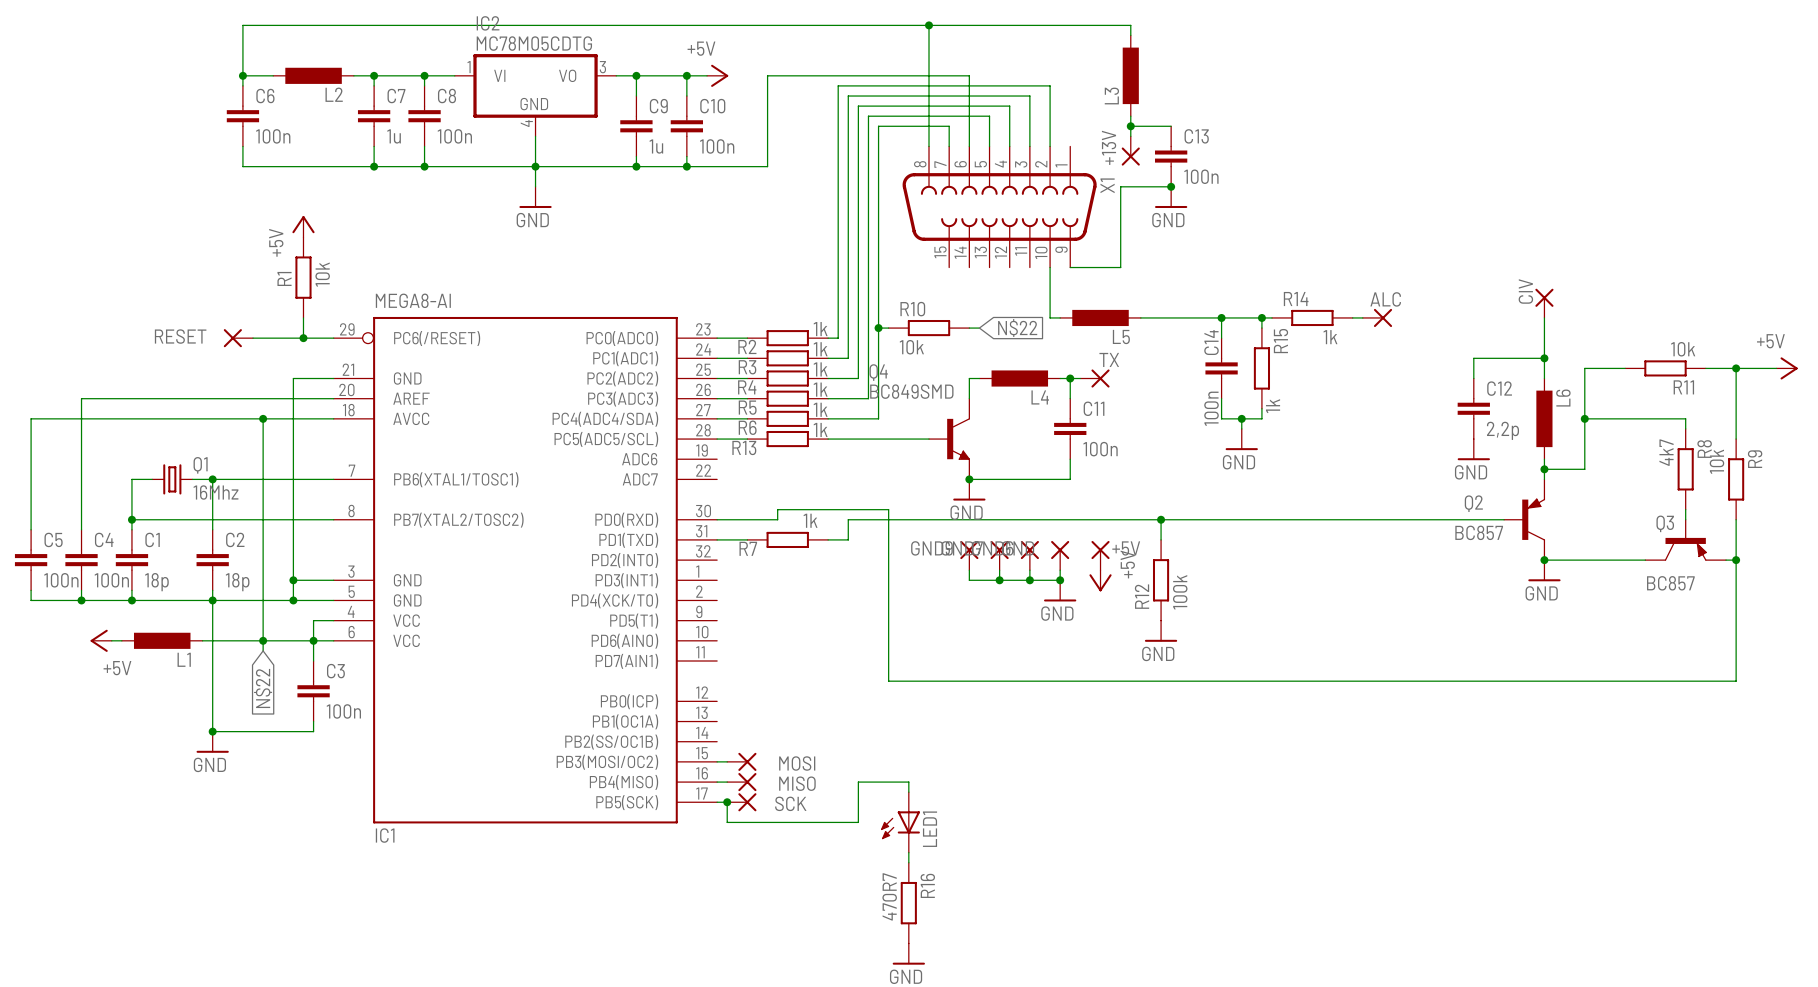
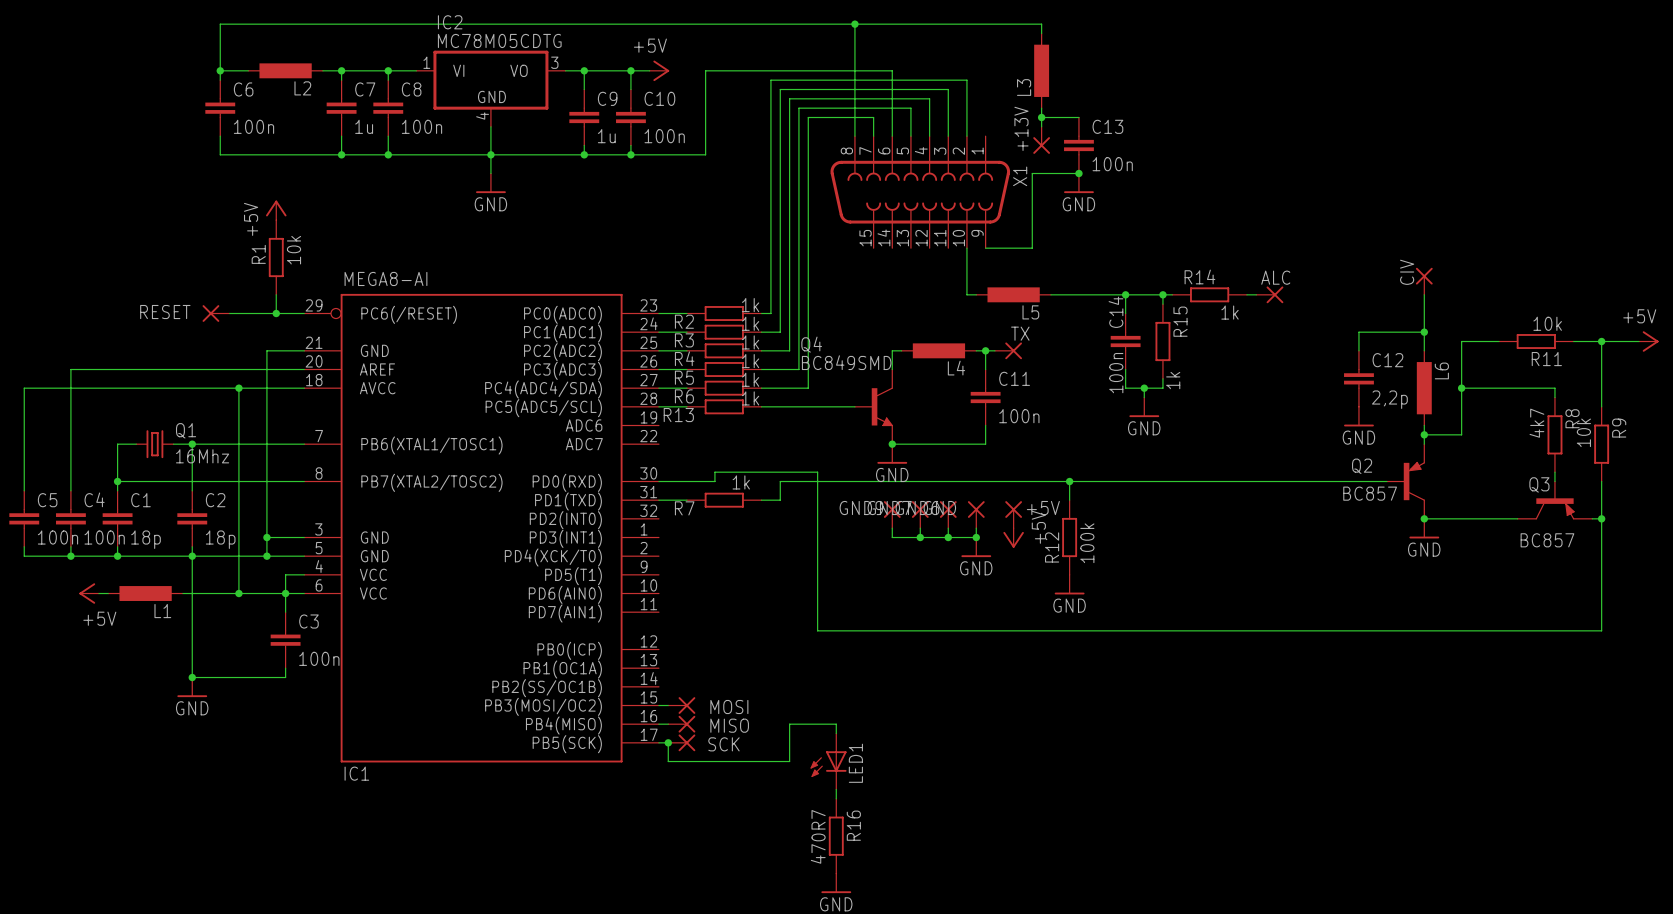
wire: (878, 328) (888, 328) -> none
junction: (878, 328) -> none
R10: 10k (929, 328) -> none
wire: (969, 328) (979, 328) -> none
global label: N$22 (1017, 328) -> none
wire: (263, 640) (263, 650) -> none
global label: N$22 (263, 688) -> none

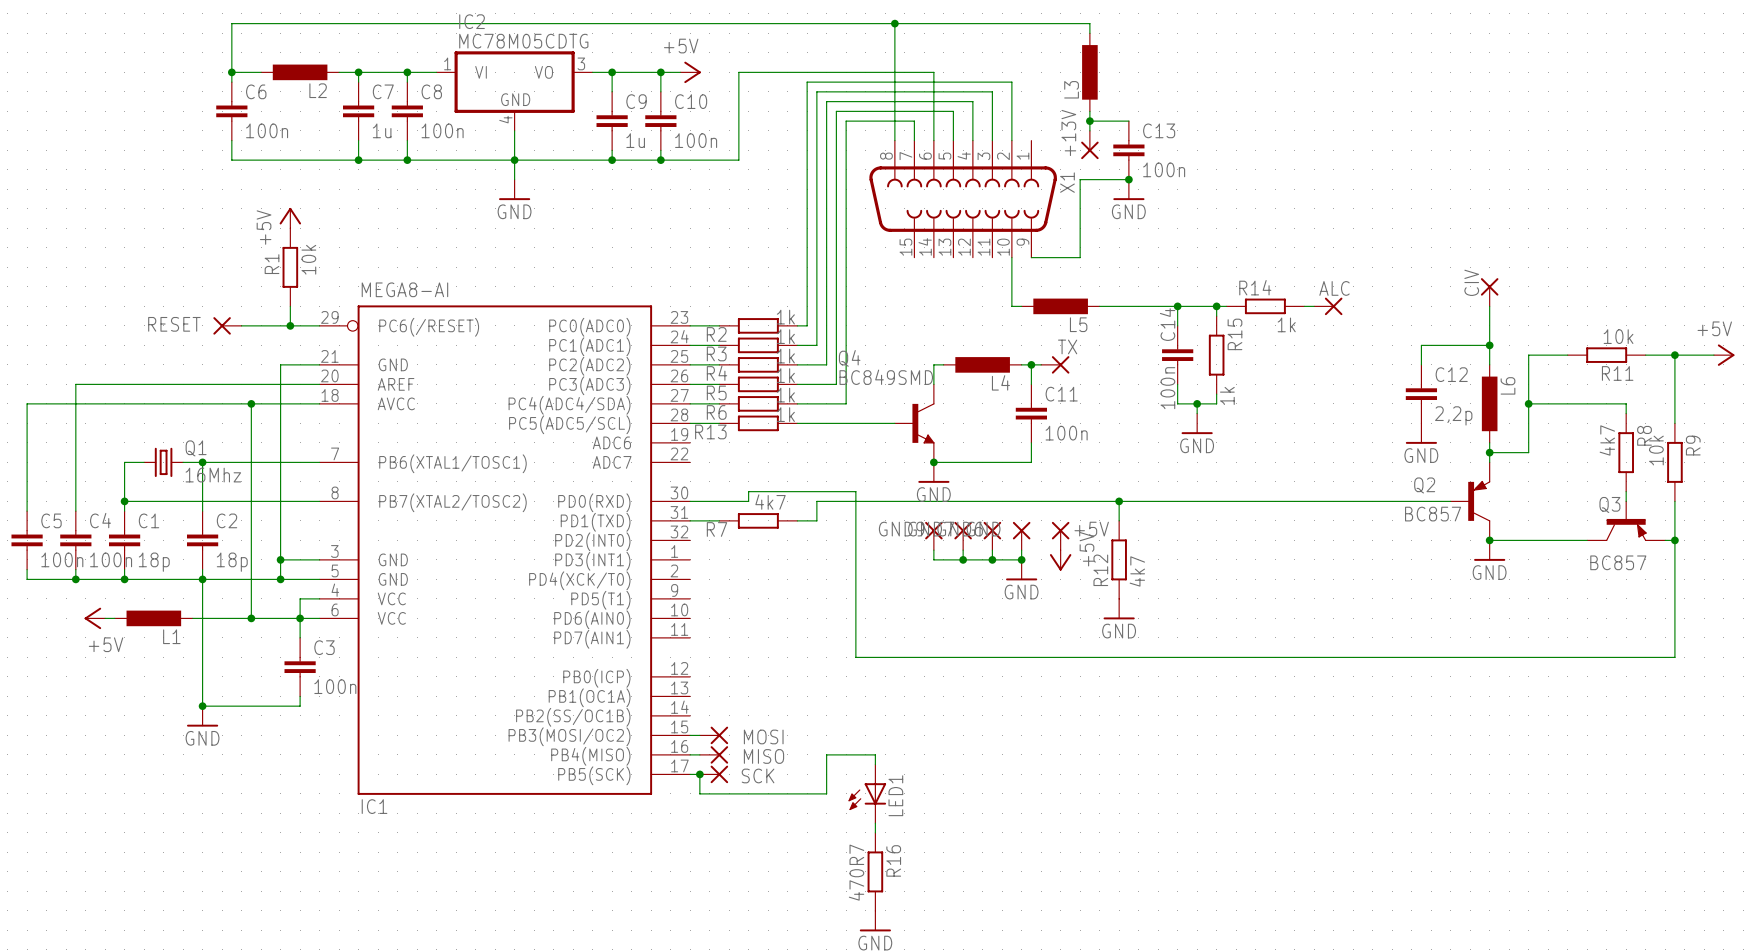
R7 value: 1k (741, 482) -> 4k7 (770, 502)
R12 value: 100k (1087, 543) -> 4k7 (1137, 571)

